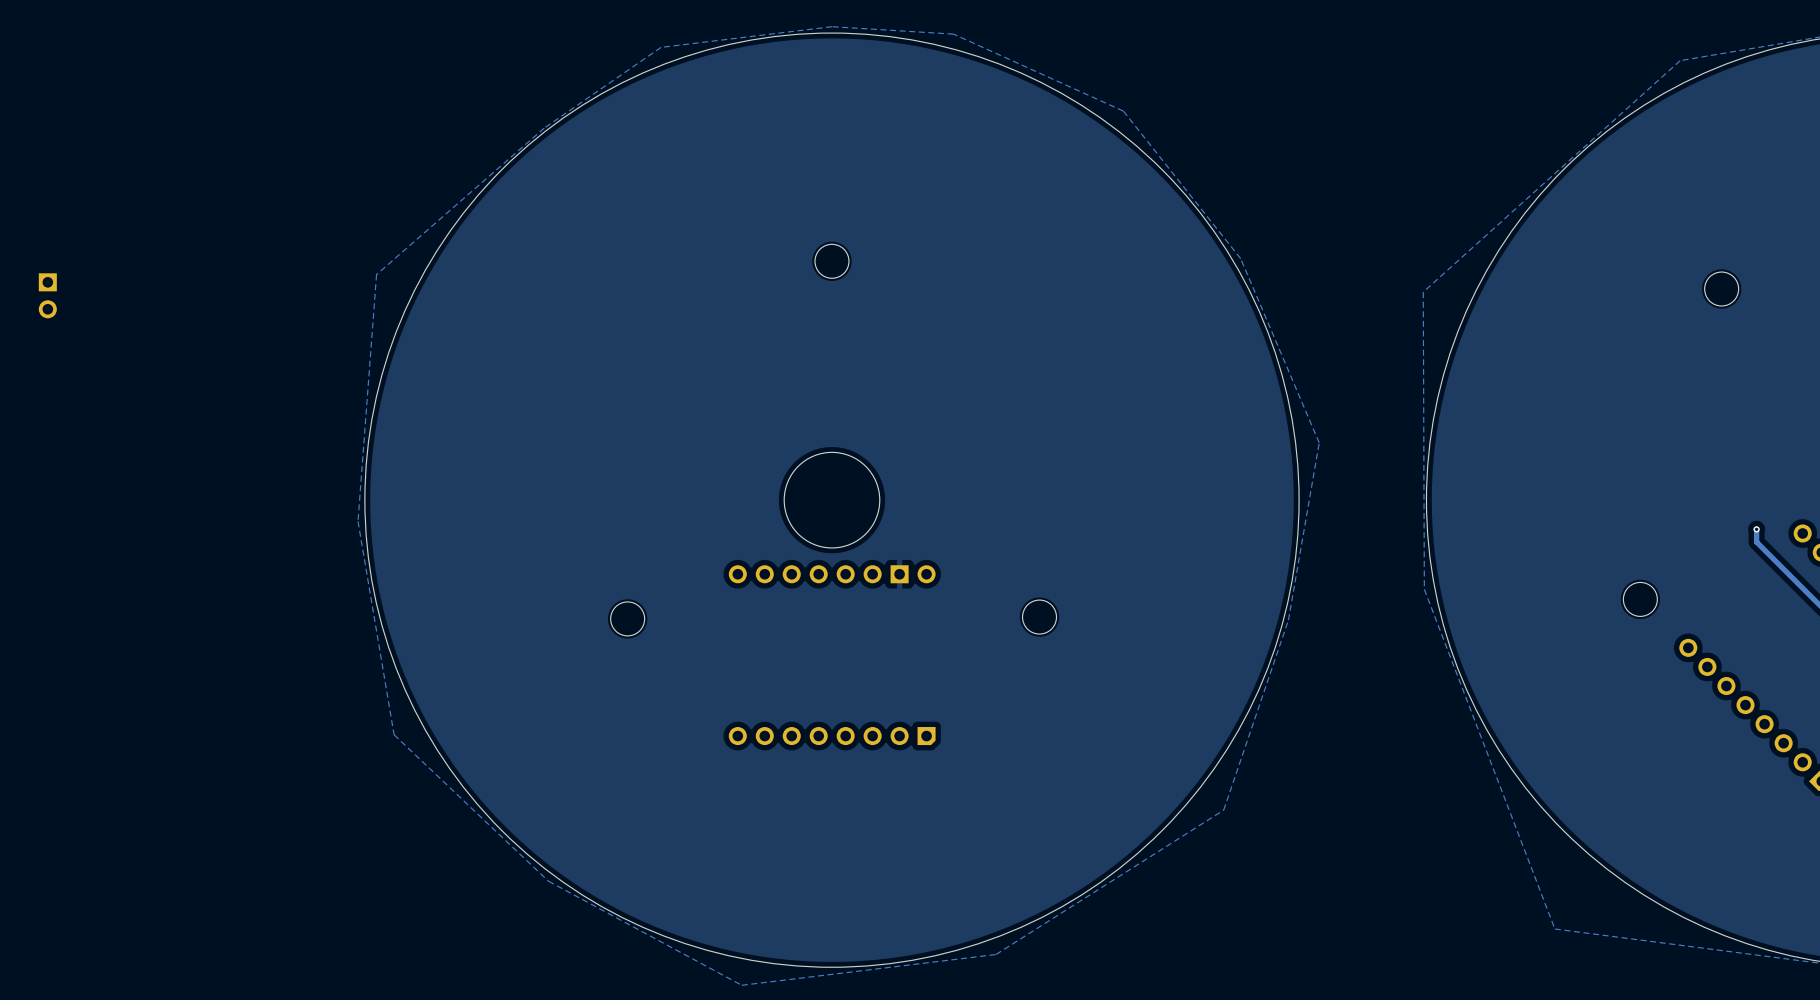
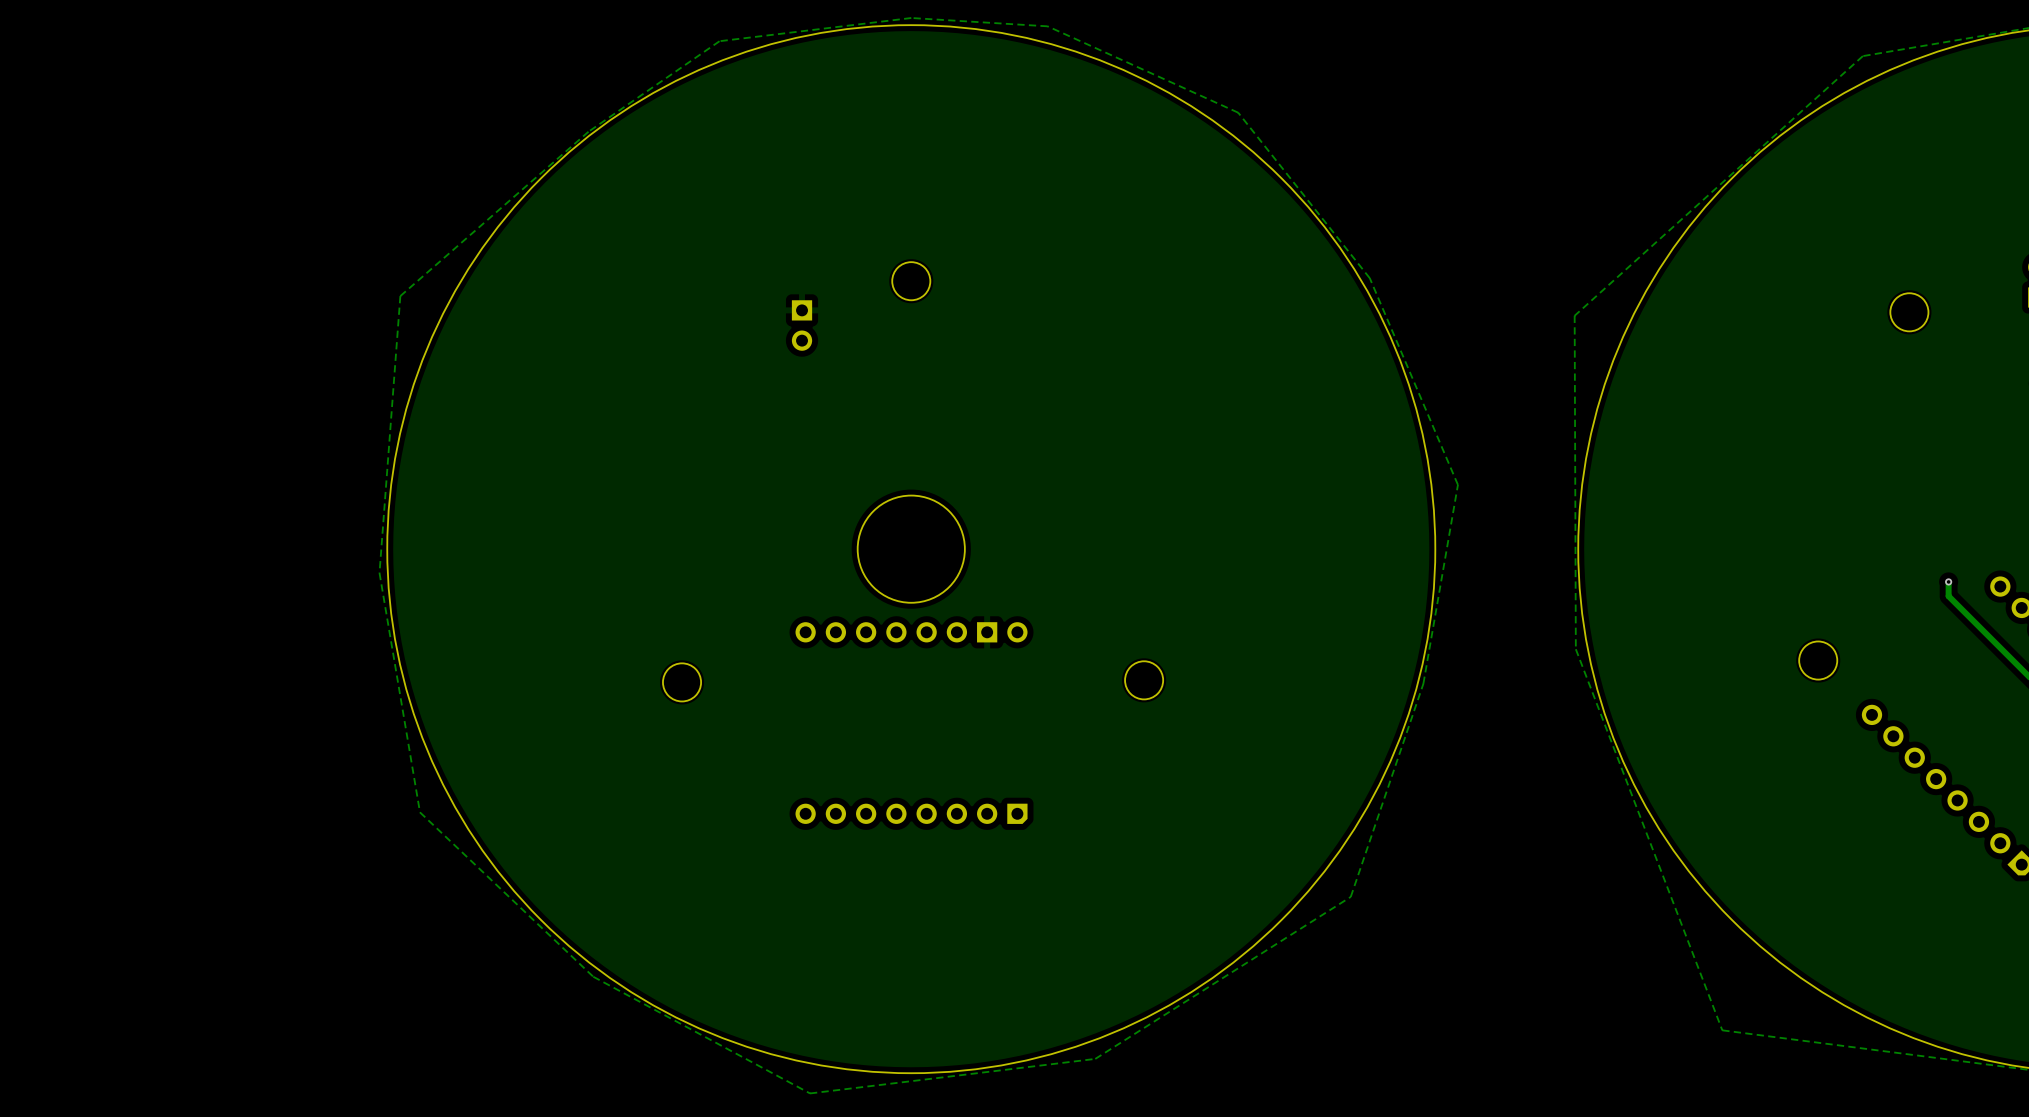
part: (47, 295) -> none
part: none -> (802, 325)

